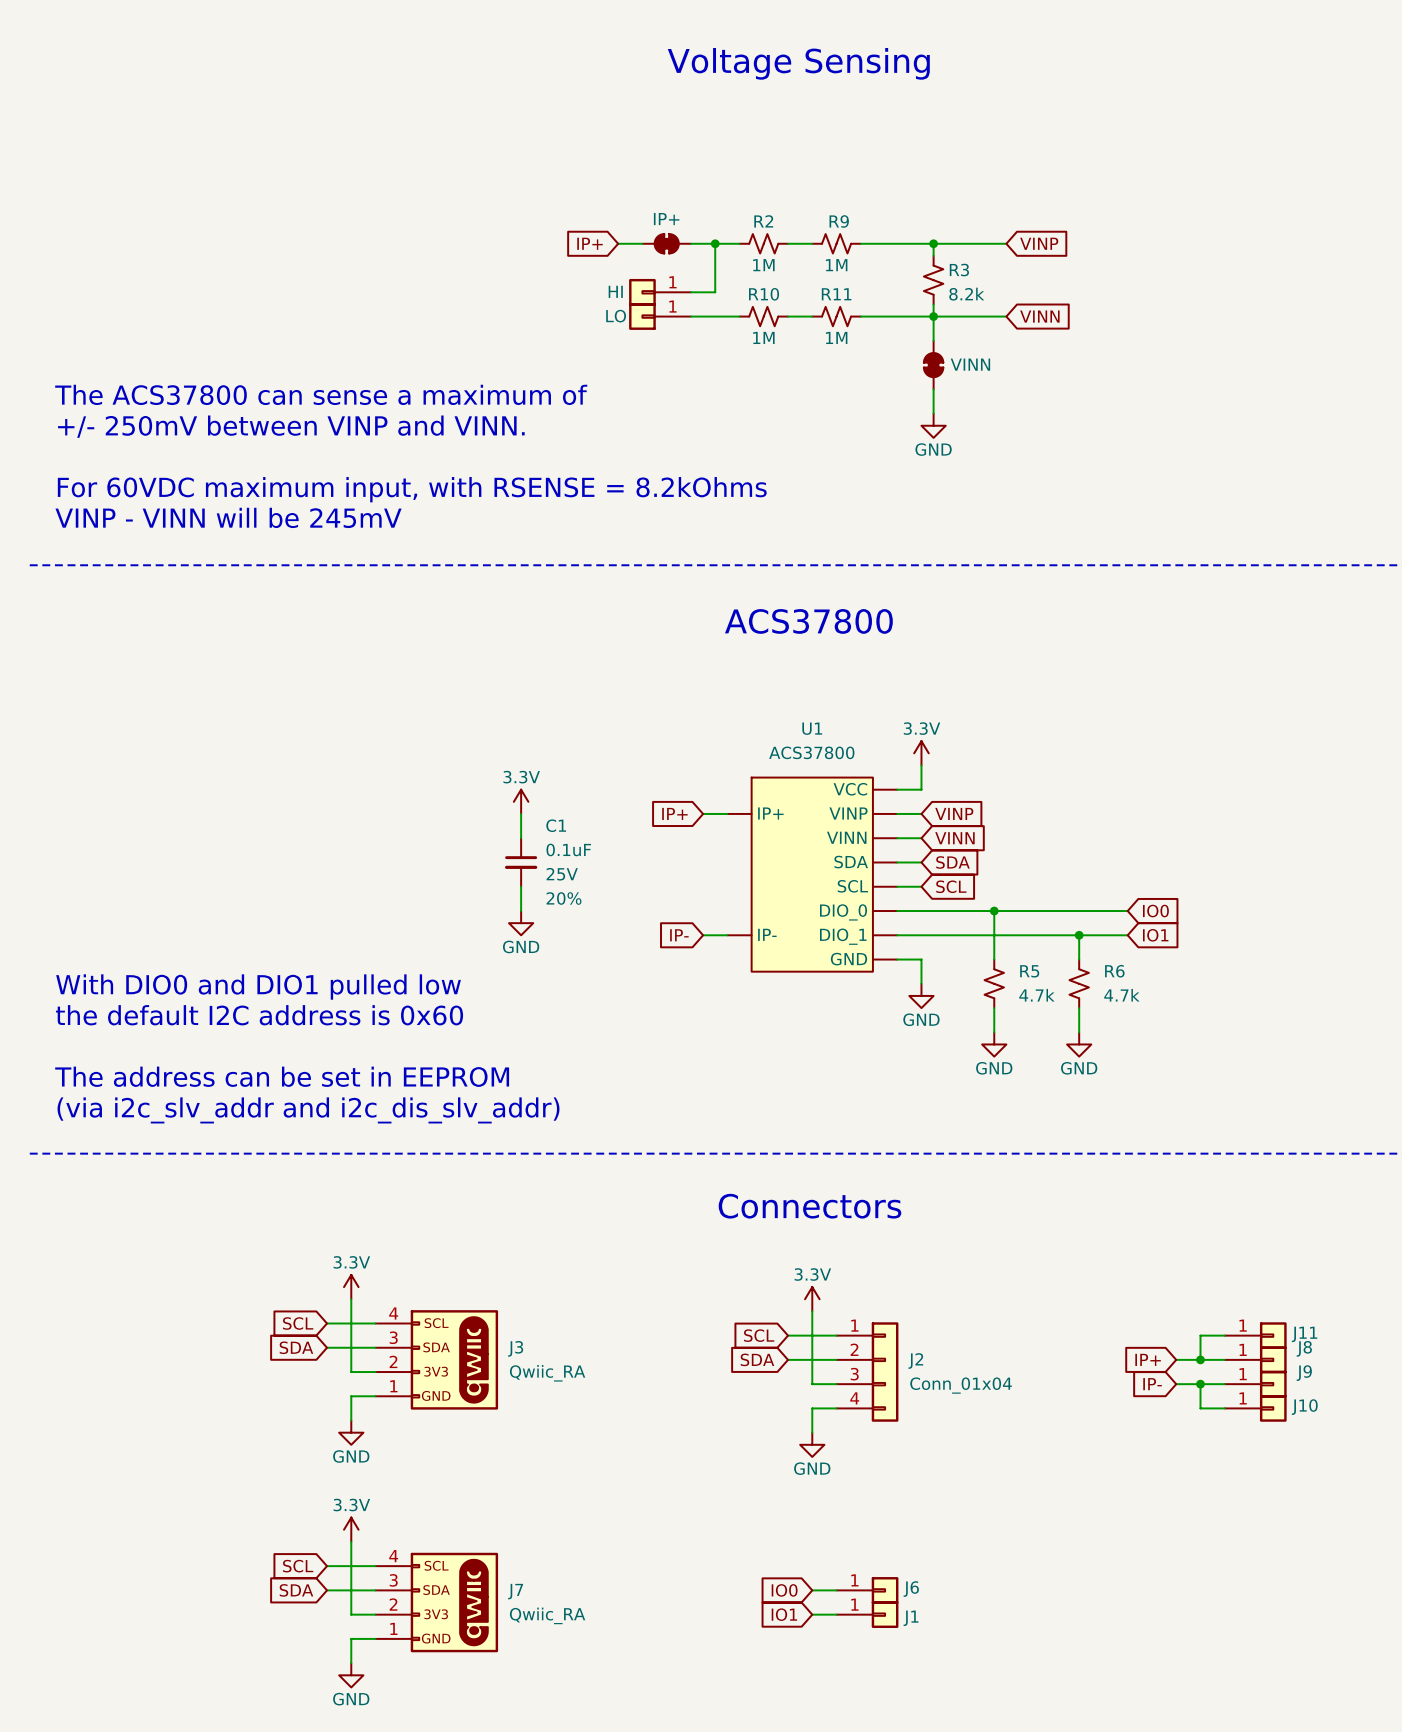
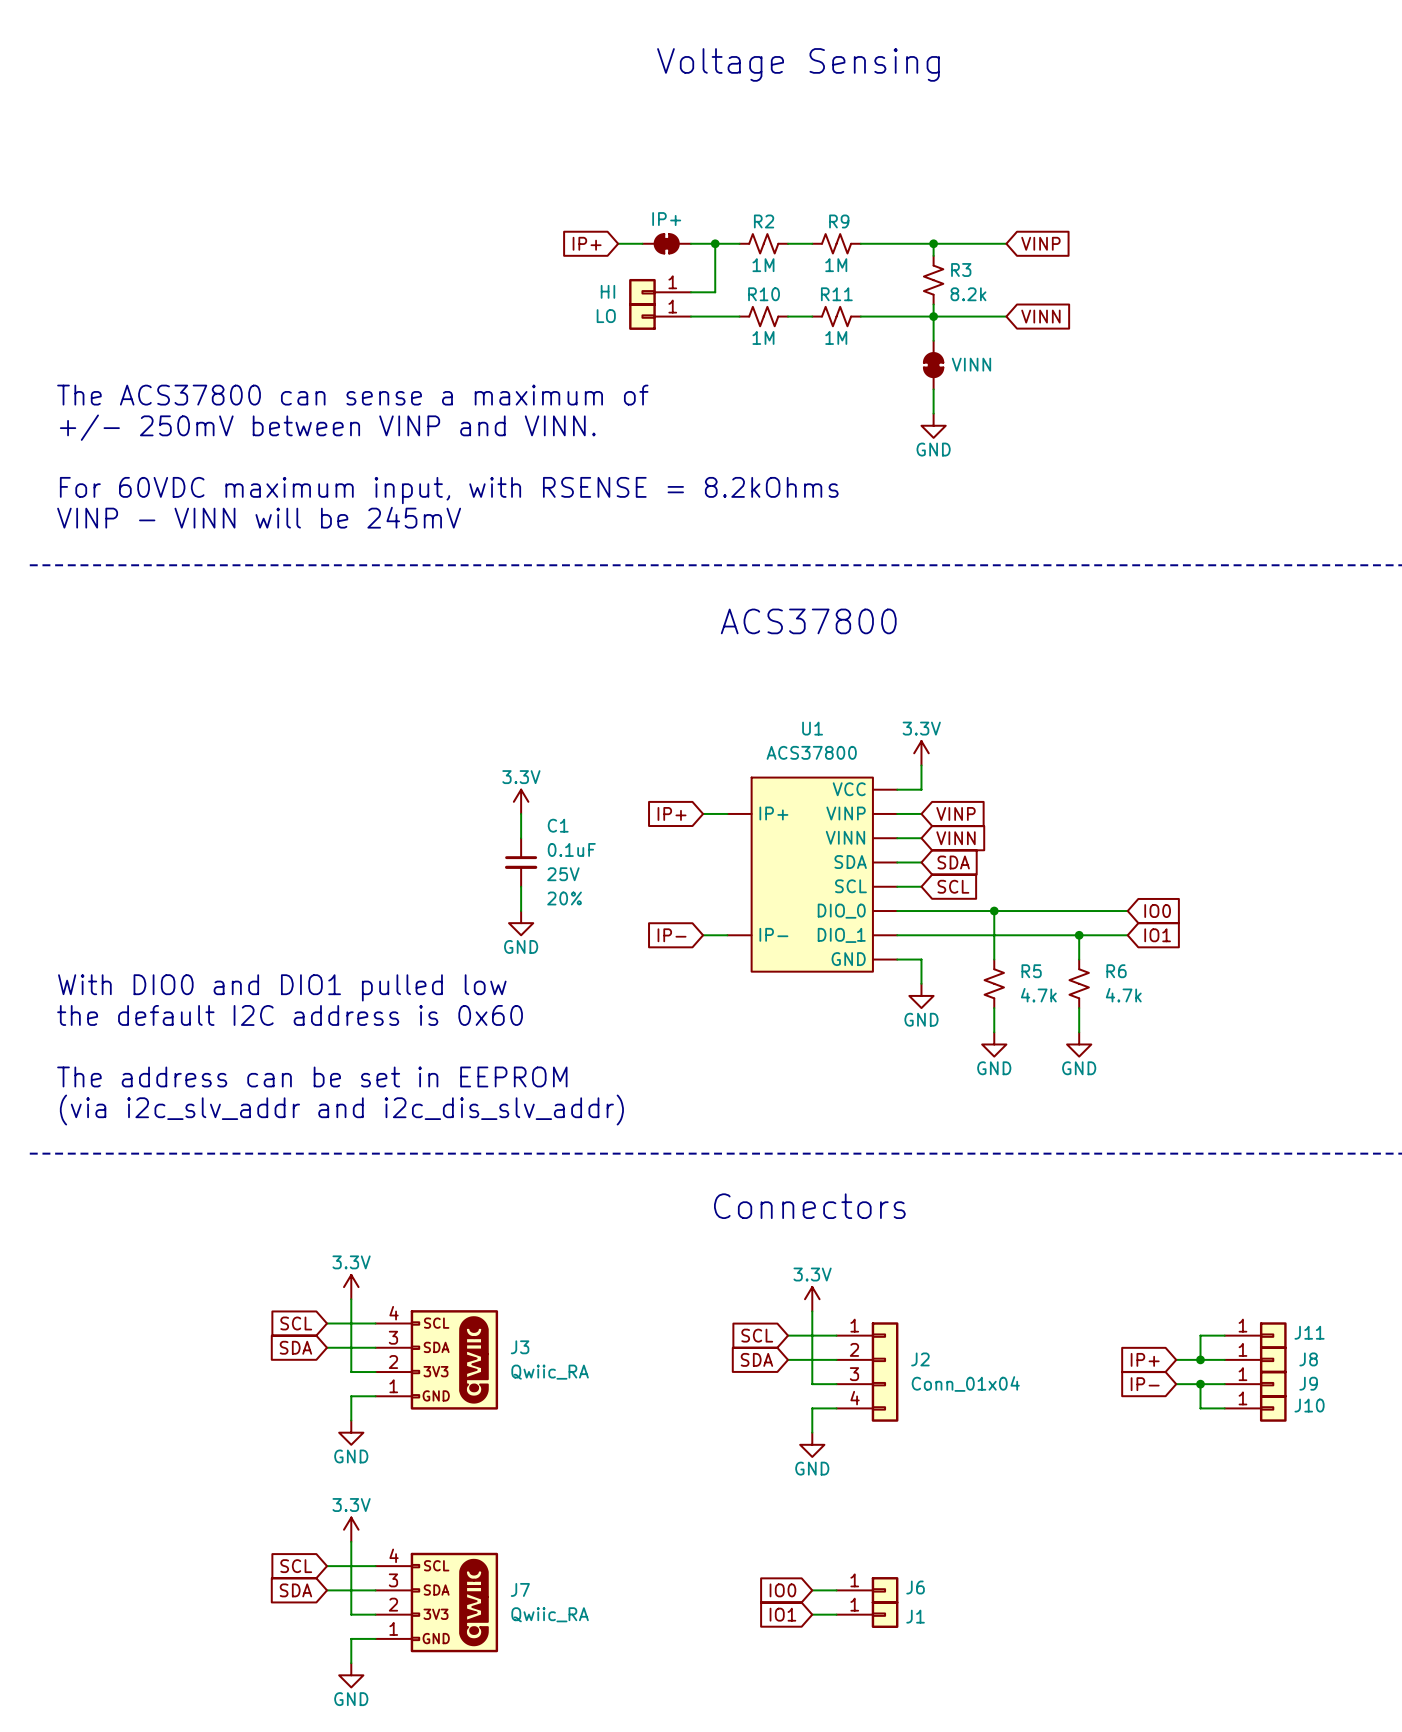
part value position: HI (615, 291) -> HI (607, 291)
part value position: LO (616, 316) -> LO (606, 316)
J8 name position: J8 (1304, 1348) -> J8 (1308, 1359)
J9 name position: J9 (1304, 1373) -> J9 (1308, 1383)

